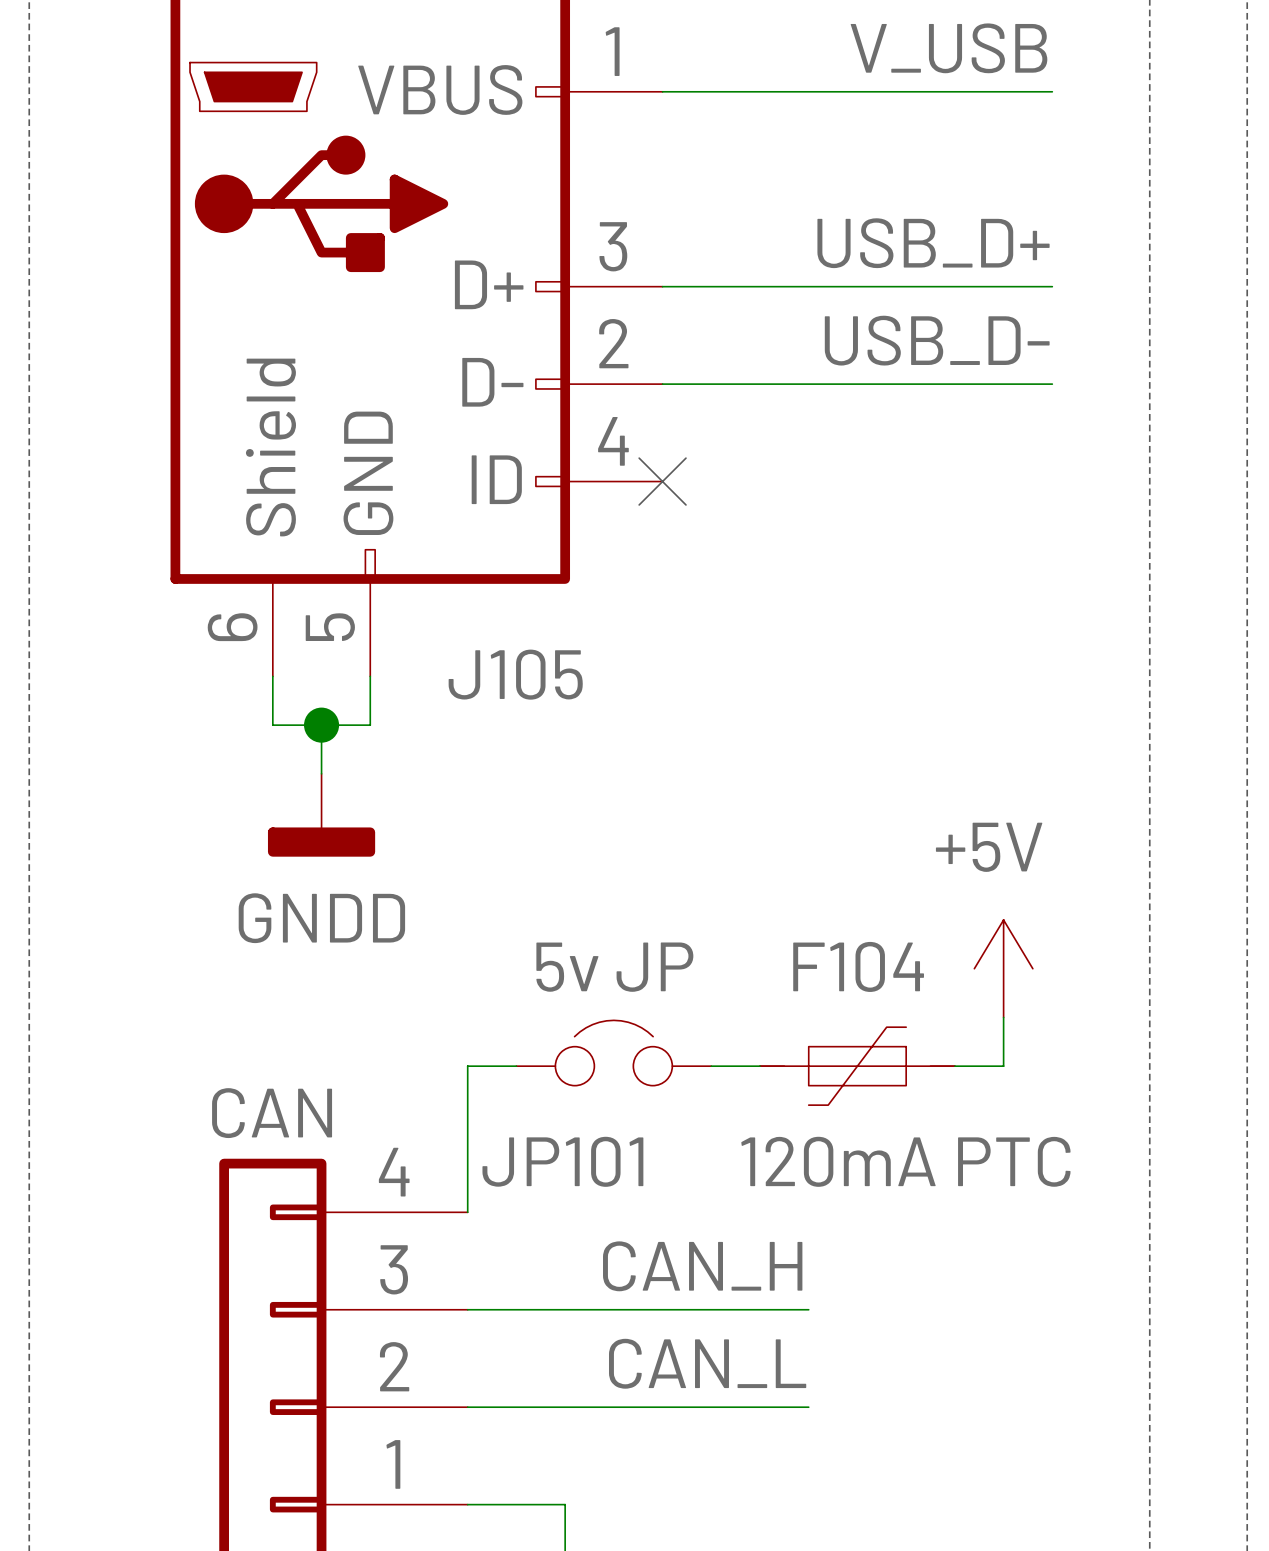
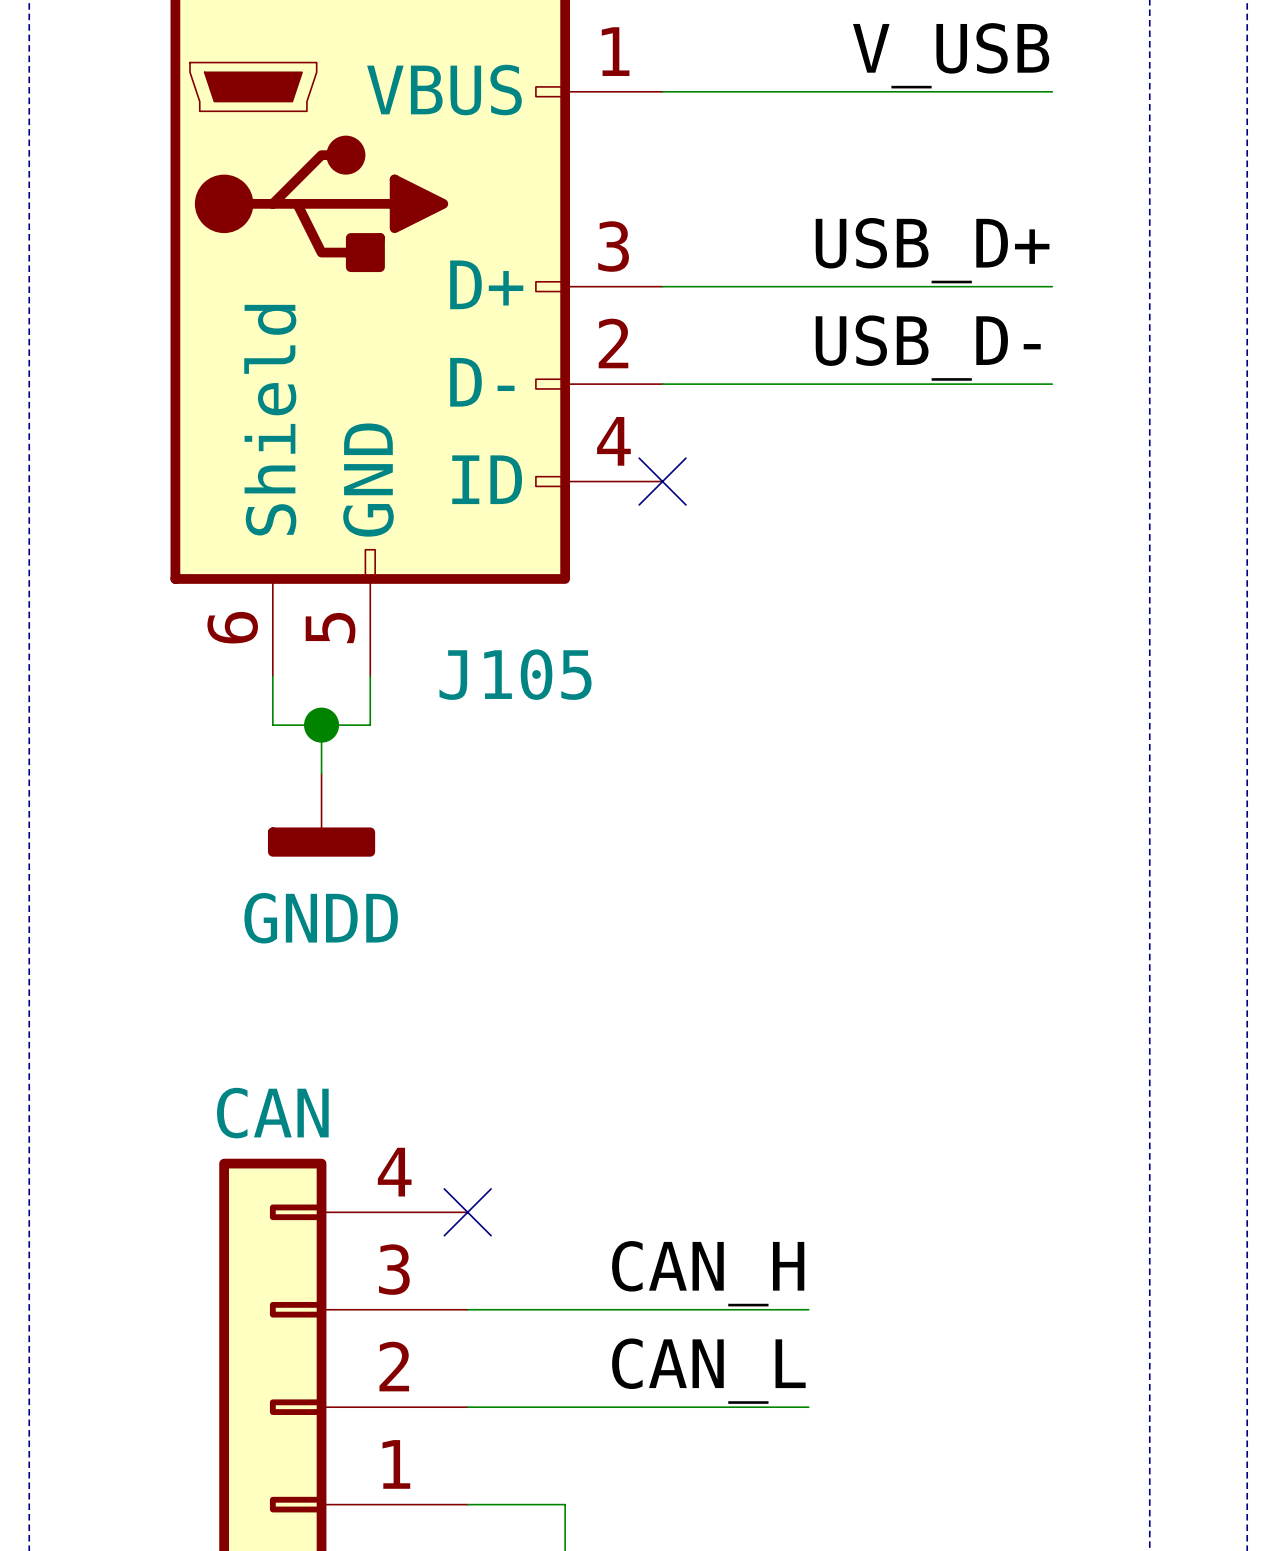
power symbol: +5V (1003, 968) -> none
wire: (1003, 1017) (1003, 1066) (954, 1066) -> none
JP101: 5v JP (613, 1053) -> none
wire: (516, 1066) (467, 1066) (467, 1212) -> none
wire: (711, 1066) (760, 1066) -> none
F104: 120mA PTC (857, 1066) -> none
no-connect mark: none -> (467, 1212)

